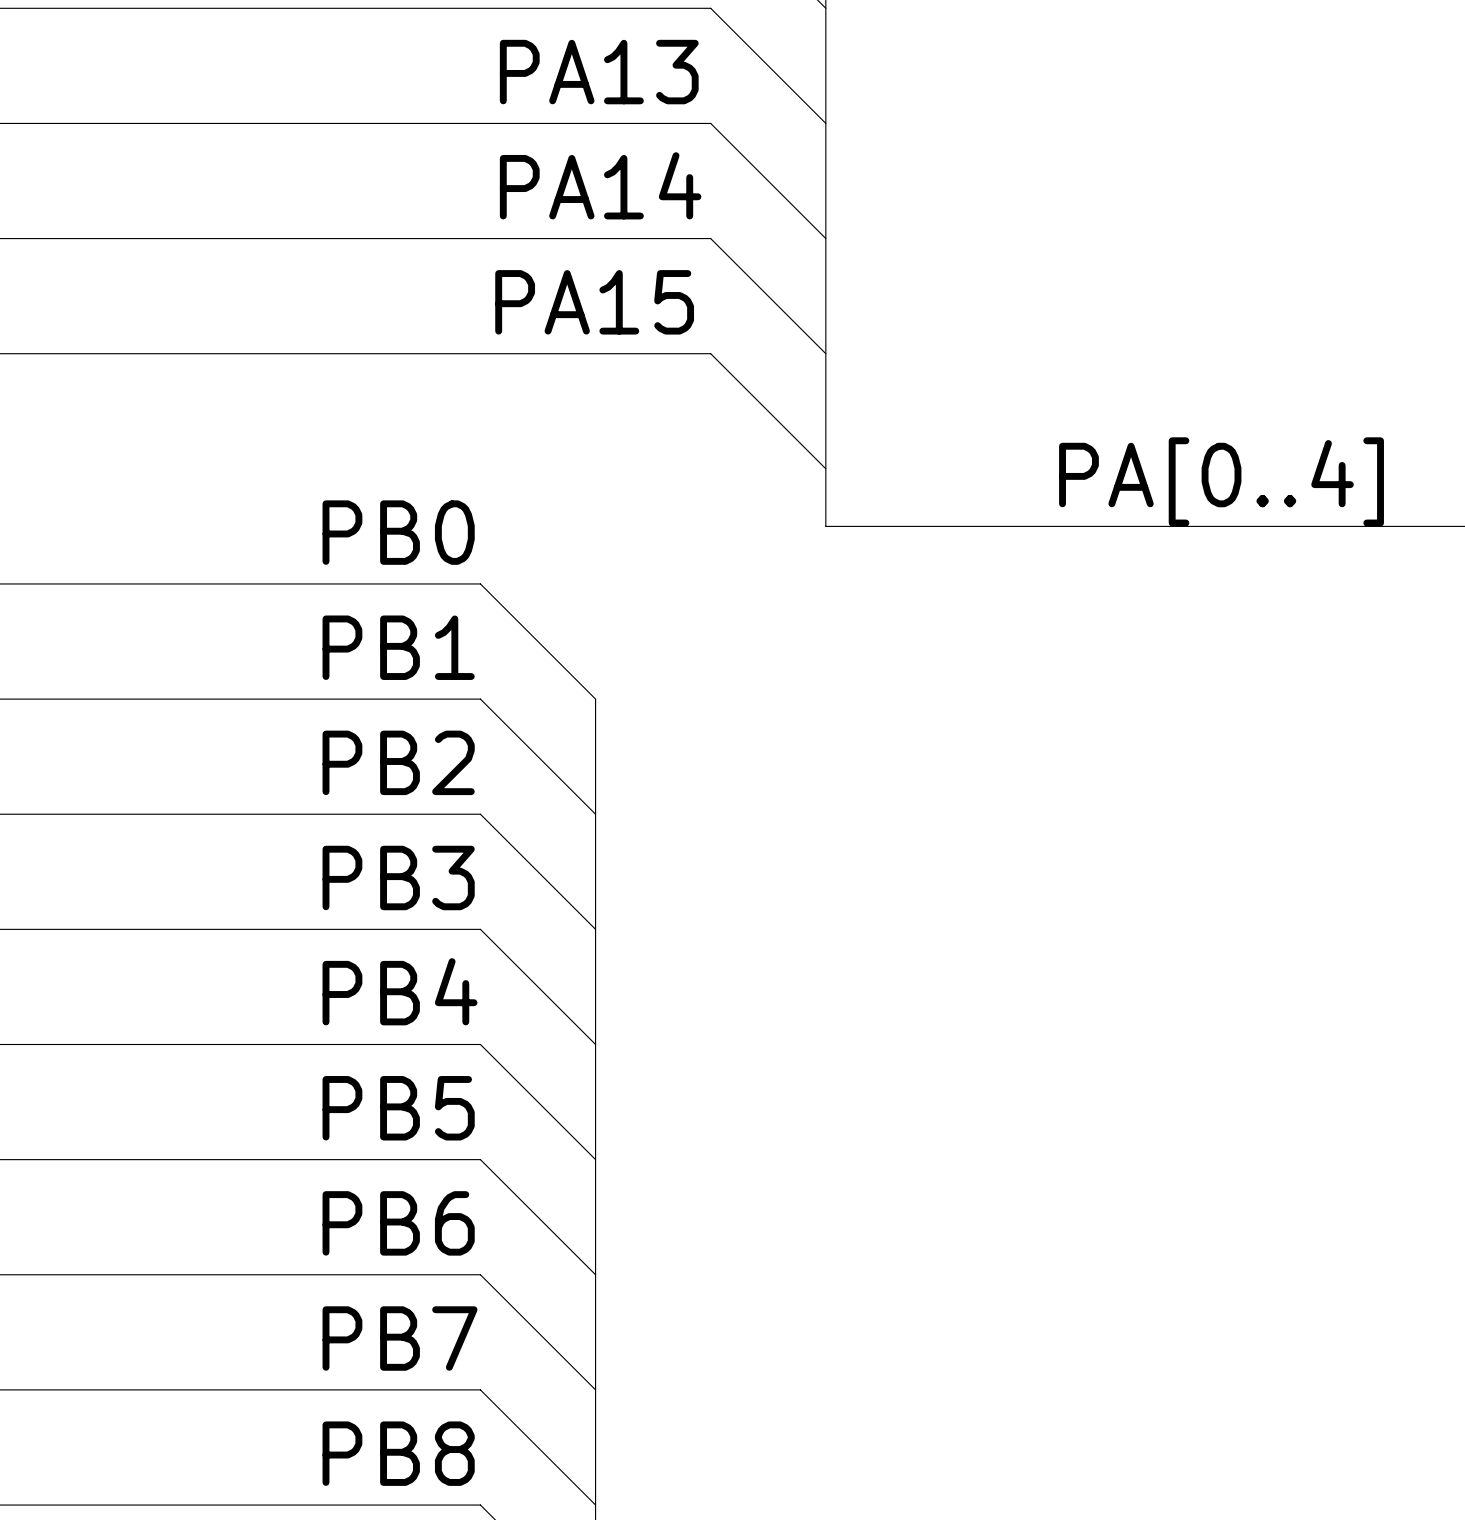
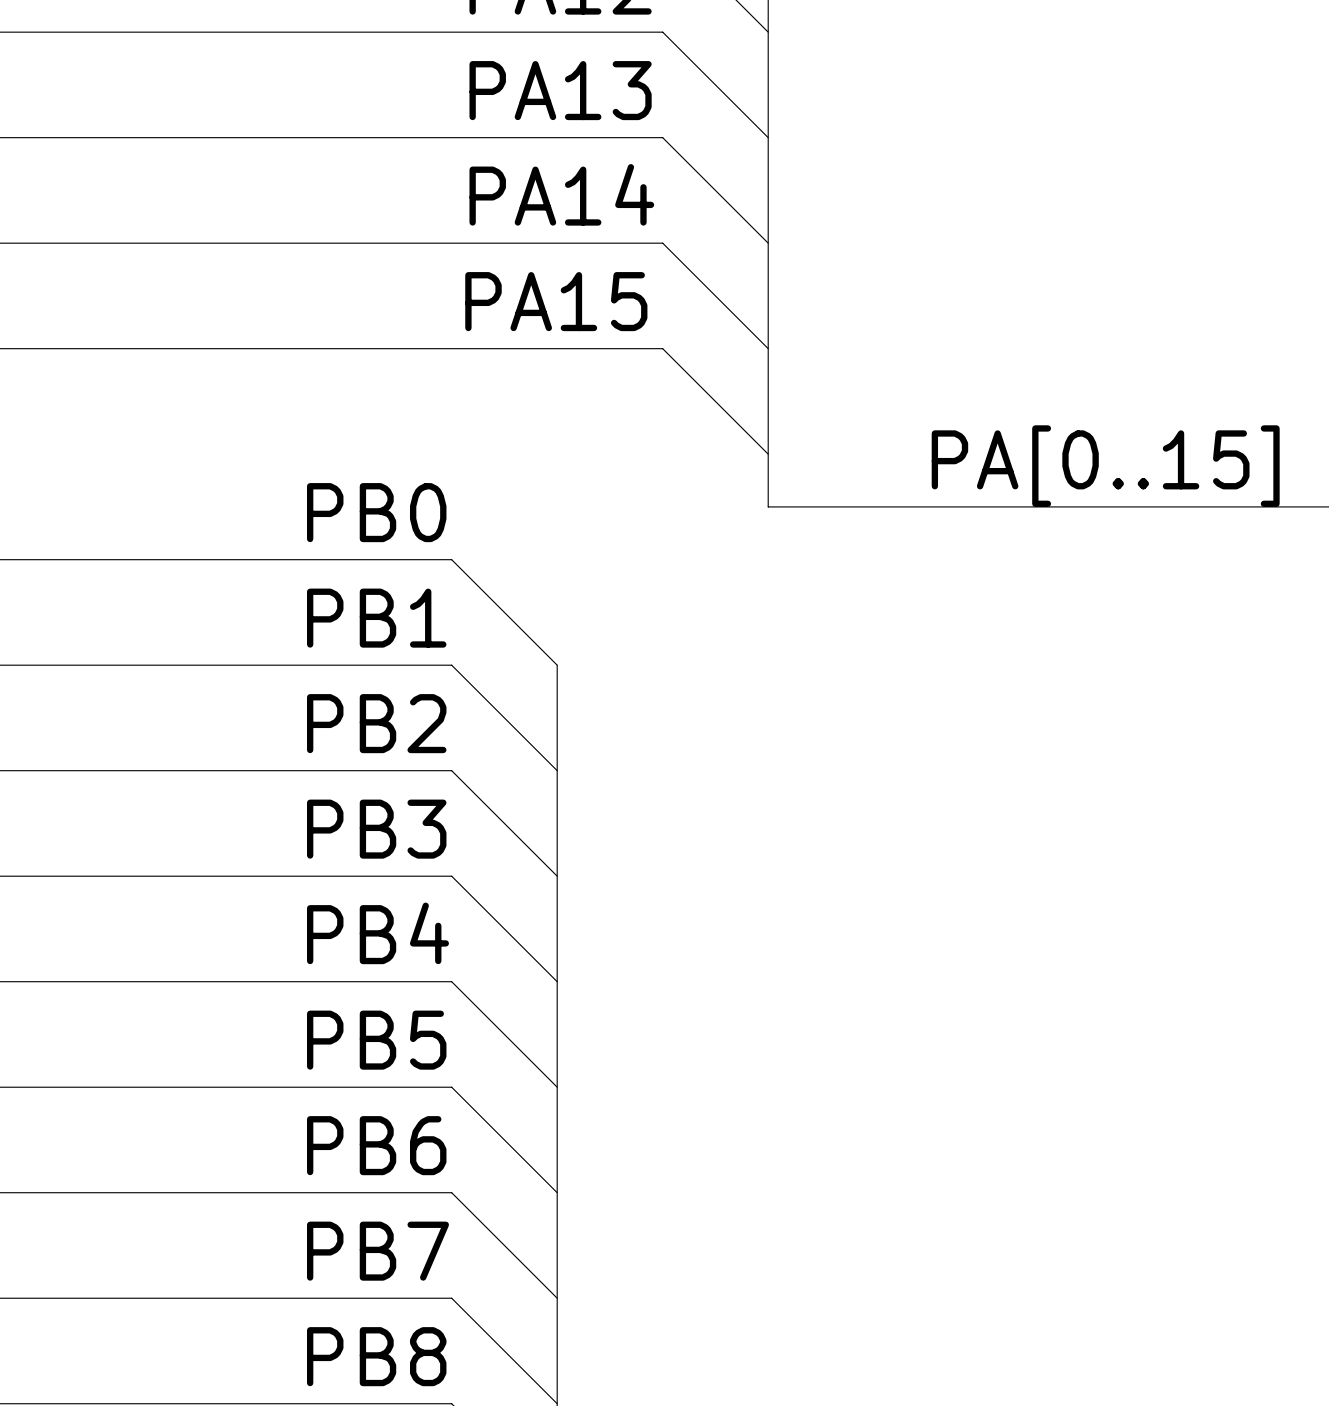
label: PA[0..4] (1221, 481) -> PA[0..15] (1105, 466)

